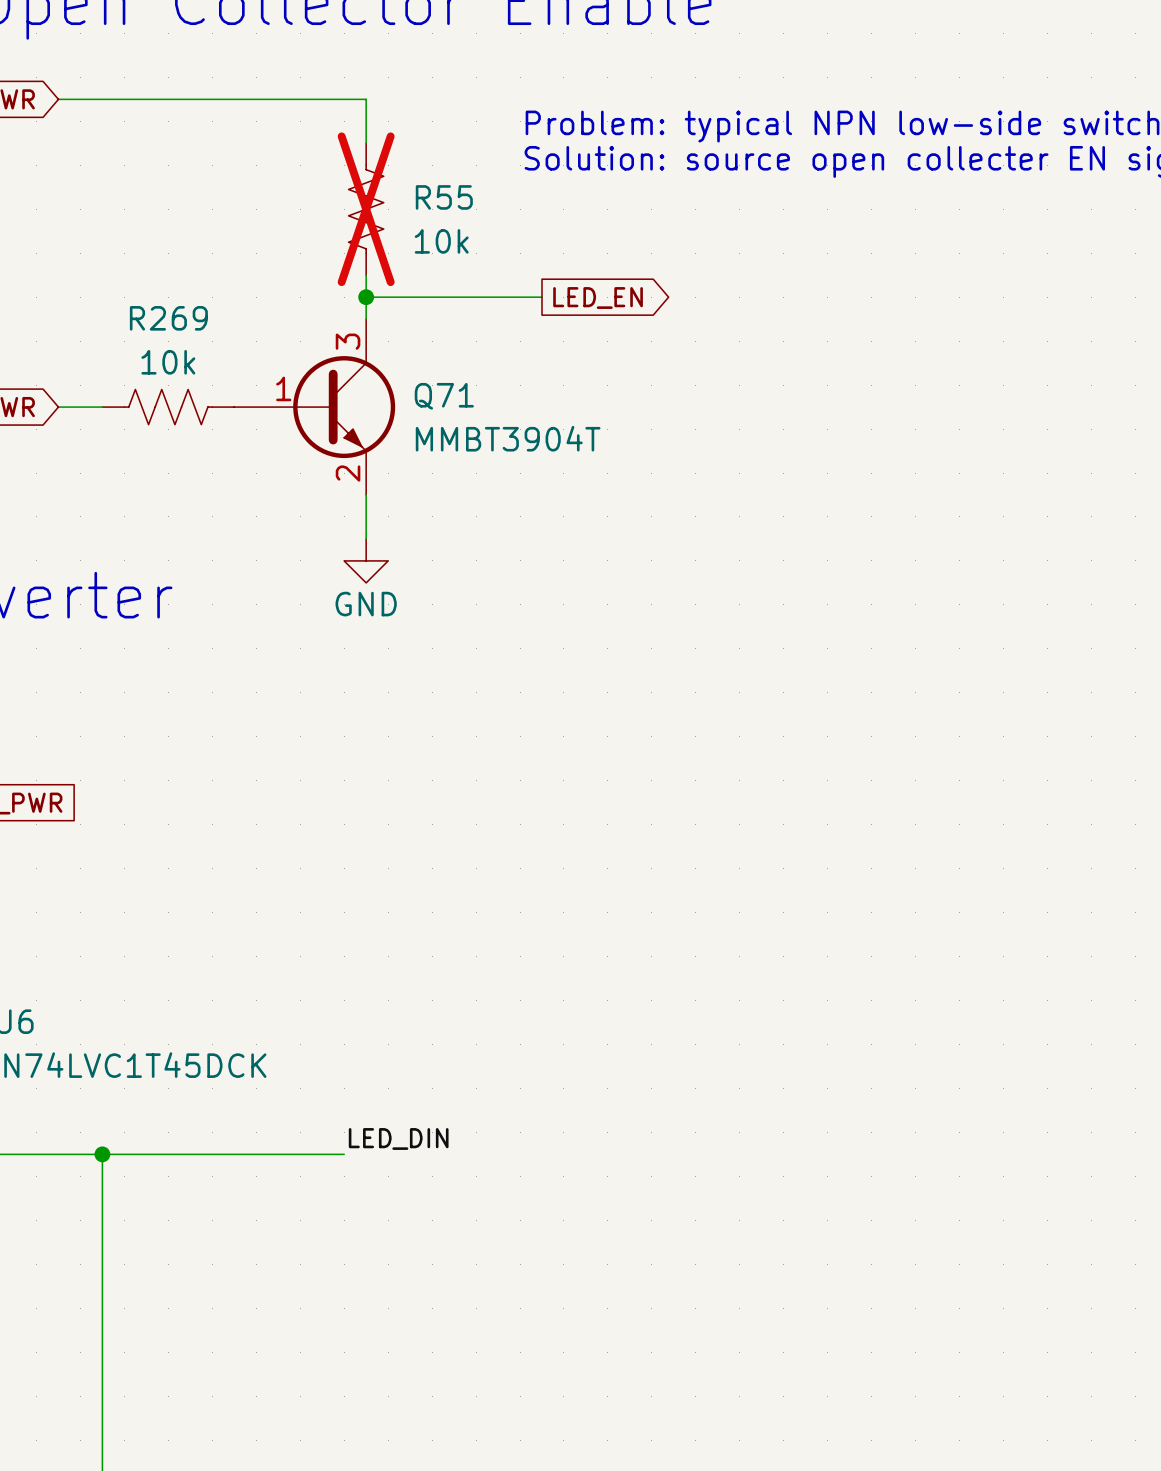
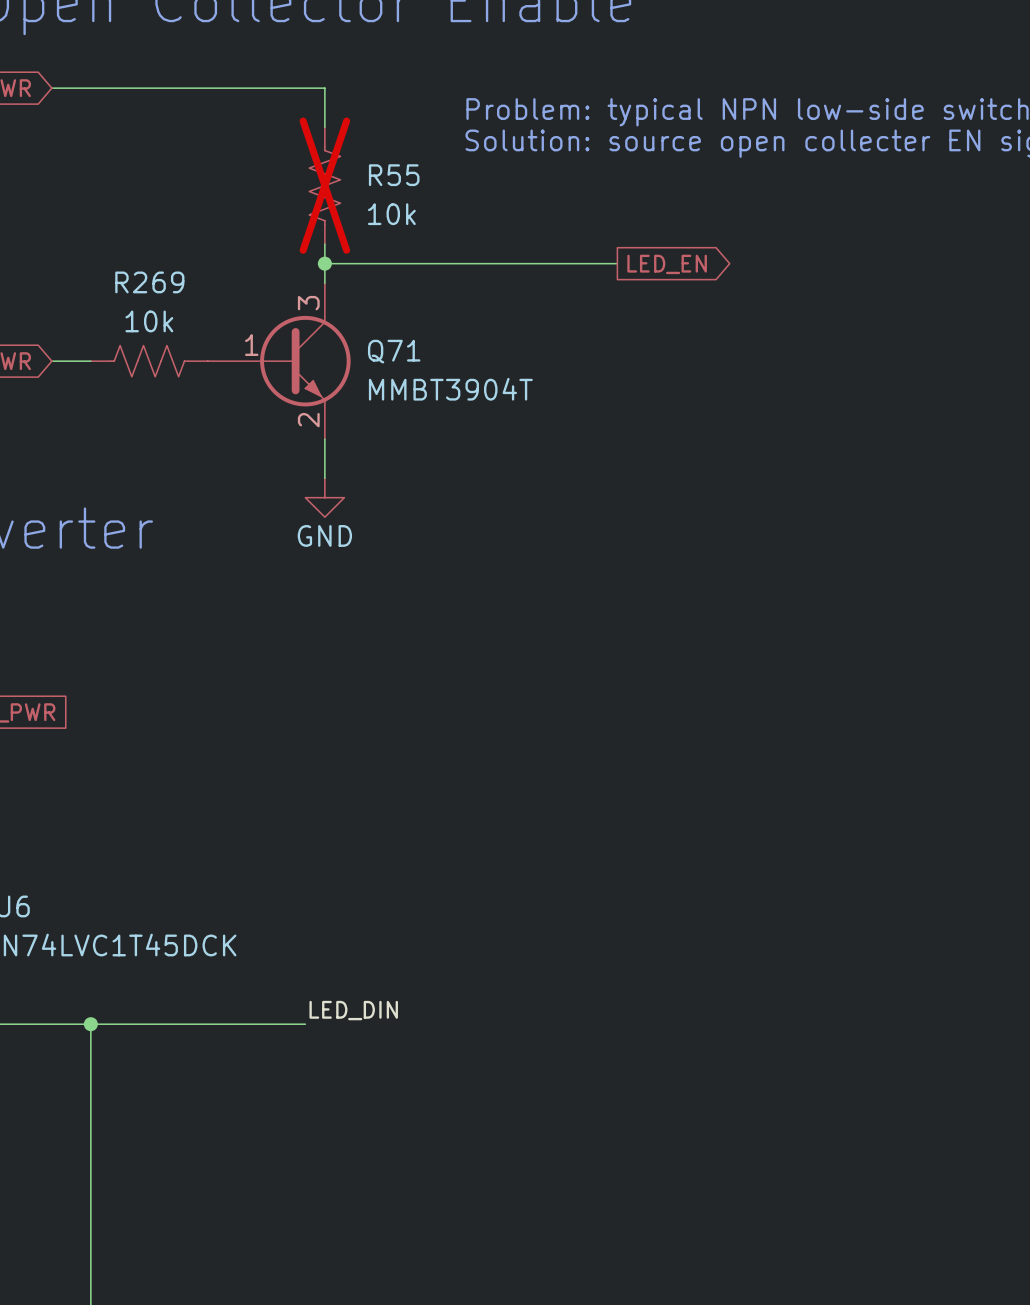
wire: none -> (480, 263) (617, 263)
global label position: LED_EN (598, 298) -> LED_EN (667, 264)

